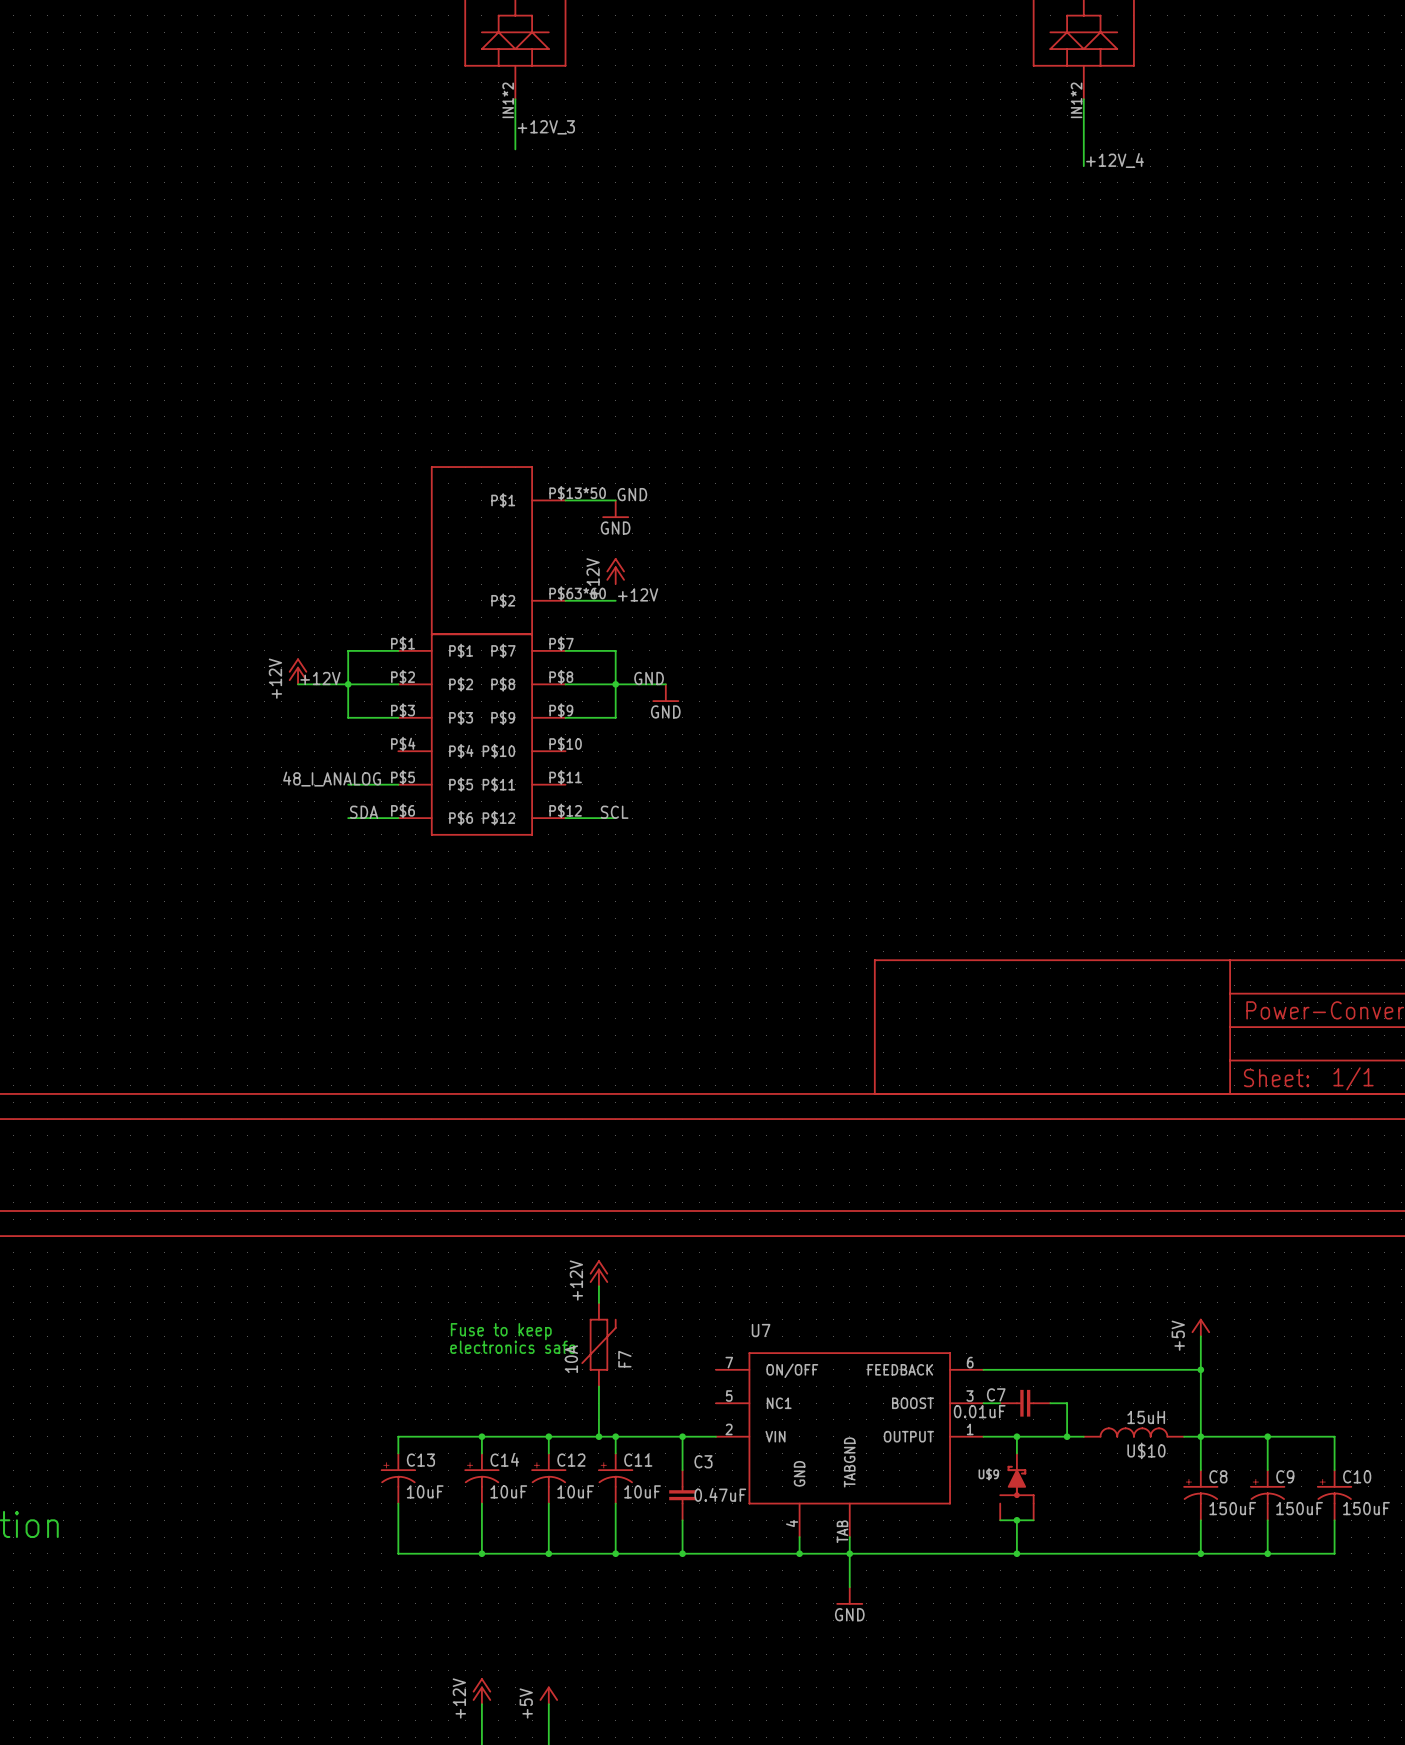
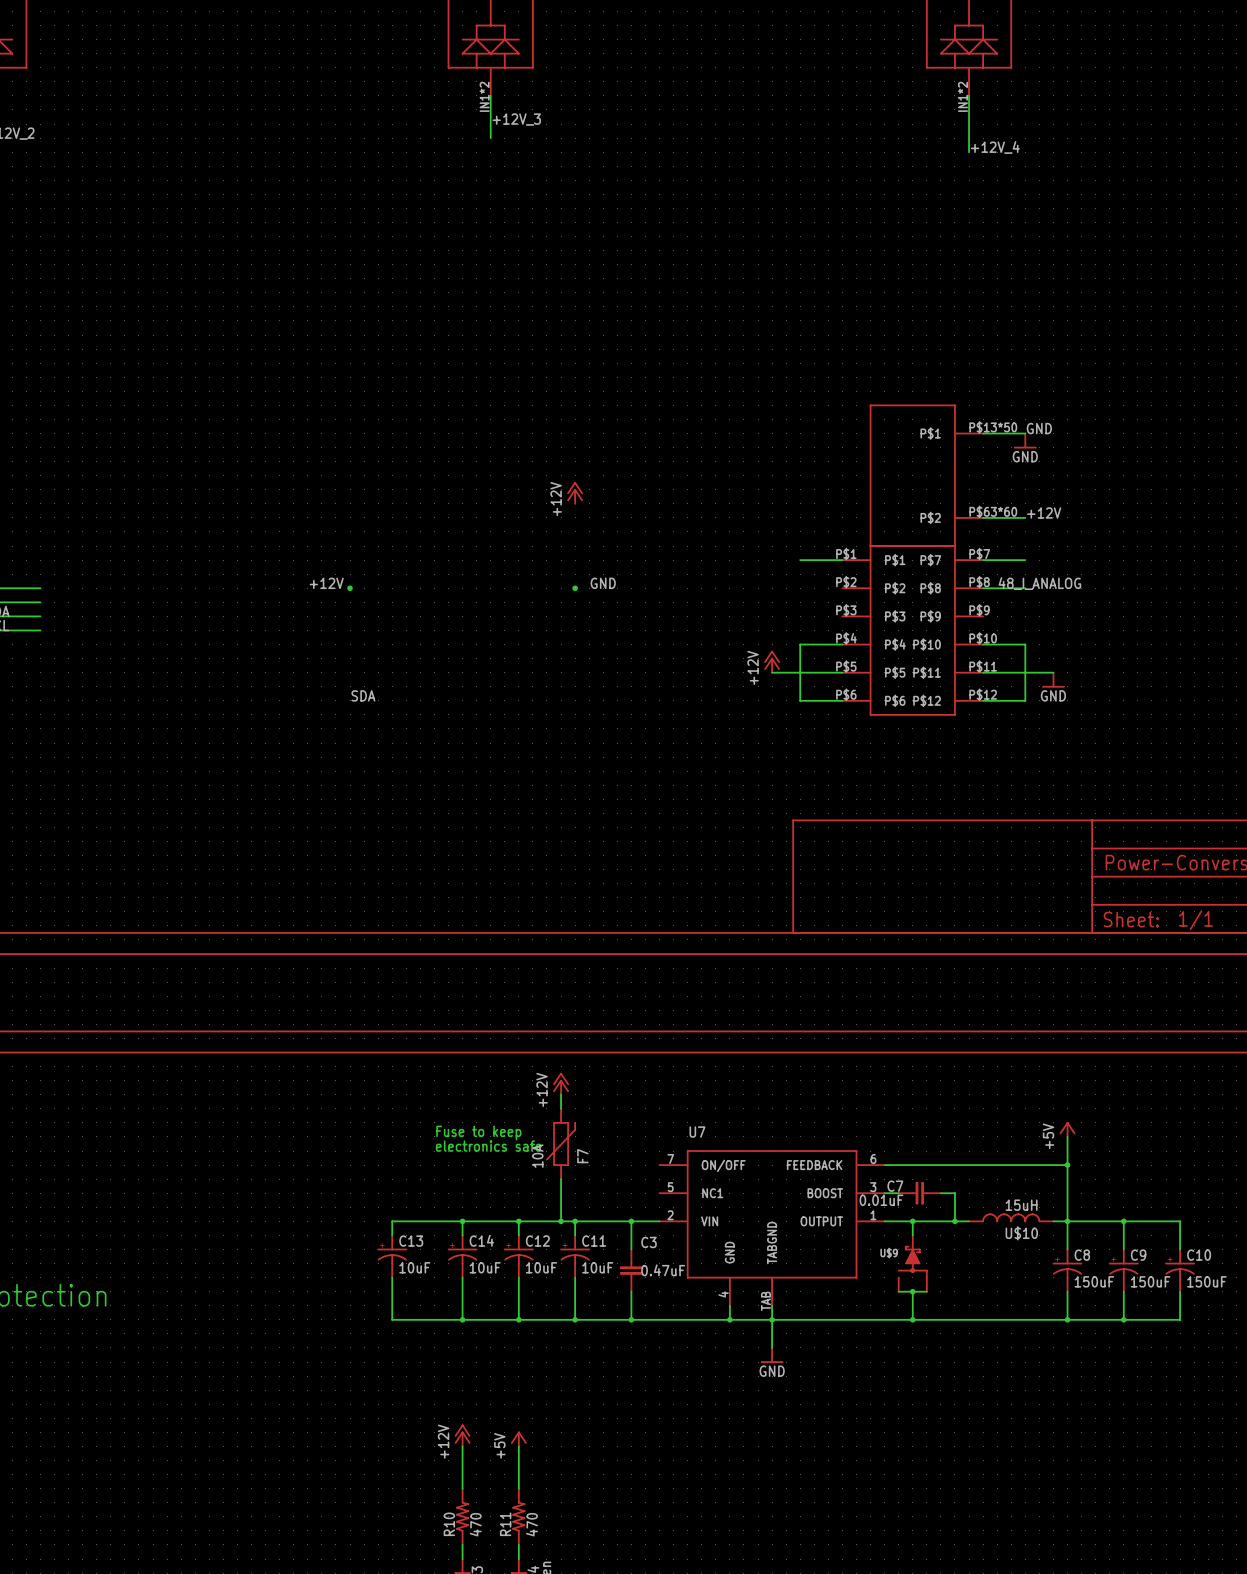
label: GND (632, 494) -> none
label: none -> GND (1039, 428)
wire: (565, 500) (615, 500) -> none
wire: none -> (983, 433) (1025, 433)
power symbol: GND (615, 509) -> none
power symbol: none -> GND (1025, 440)
part: (498, 550) -> none
part: none -> (926, 475)
label: +12V (638, 594) -> none
label: none -> +12V (1044, 513)
wire: (565, 600) (615, 600) -> none
wire: none -> (983, 517) (1025, 517)
wire: (398, 650) (348, 650) (348, 717) (398, 717) -> none
wire: (565, 650) (615, 650) (615, 717) (565, 717) -> none
wire: none -> (800, 560) (842, 560)
wire: none -> (983, 560) (1025, 560)
power symbol: +12V (298, 671) -> none
label: none -> 48_I_ANALOG (1039, 583)
wire: (298, 684) (398, 684) -> none
wire: (565, 684) (665, 684) -> none
wire: none -> (983, 588) (1025, 588)
power symbol: GND (665, 693) -> none
part: (481, 734) -> none
part: none -> (912, 630)
wire: none -> (842, 644) (800, 644) (800, 700) (842, 700)
wire: none -> (983, 644) (1025, 644) (1025, 700) (983, 700)
power symbol: none -> +12V (772, 661)
label: 48_I_ANALOG (332, 779) -> none
wire: (348, 784) (398, 784) -> none
wire: none -> (772, 672) (842, 672)
wire: none -> (983, 672) (1053, 672)
power symbol: none -> GND (1053, 680)
label: SCL (614, 812) -> none
wire: (348, 818) (398, 818) -> none
wire: (565, 818) (615, 818) -> none

